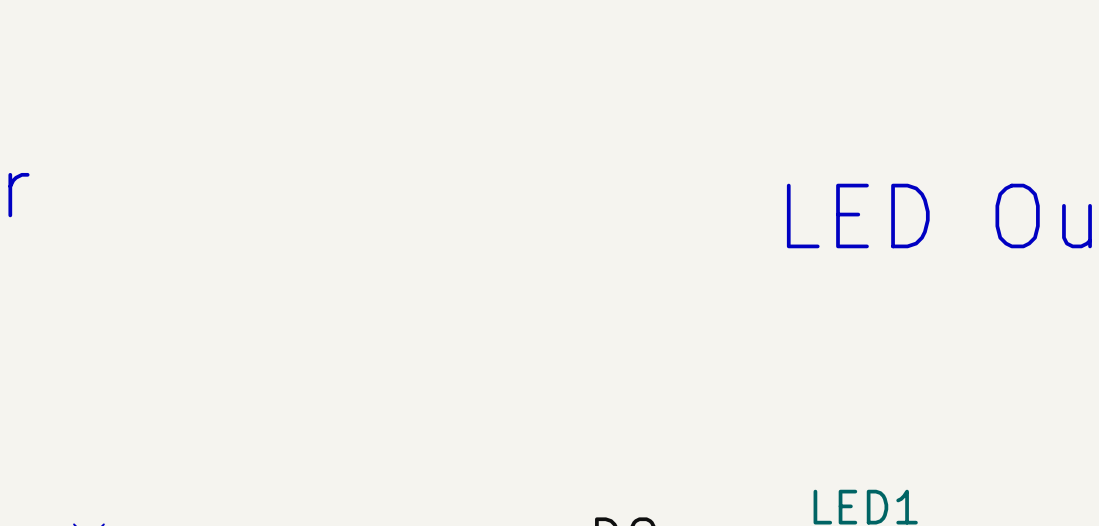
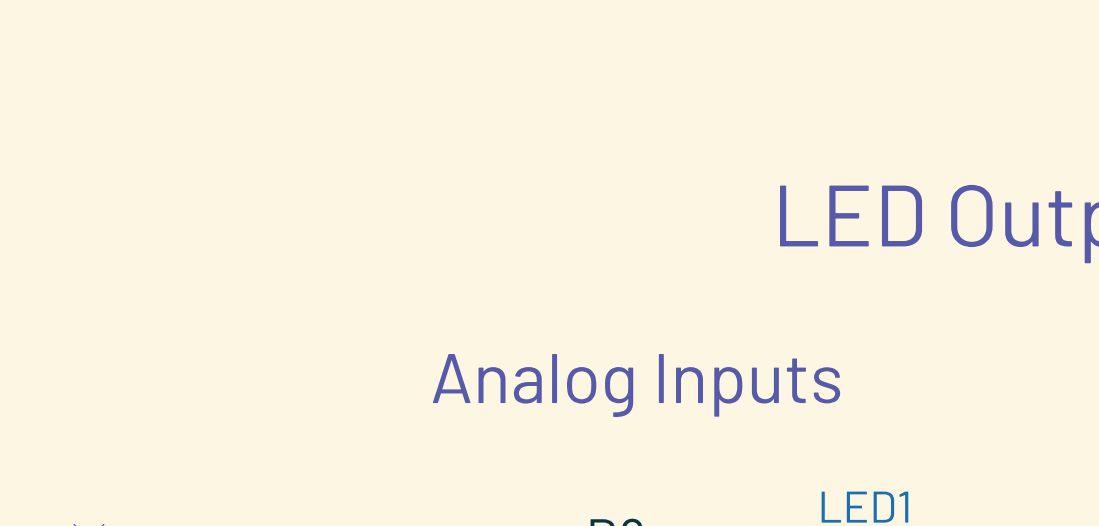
text: none -> Analog Inputs (636, 385)

